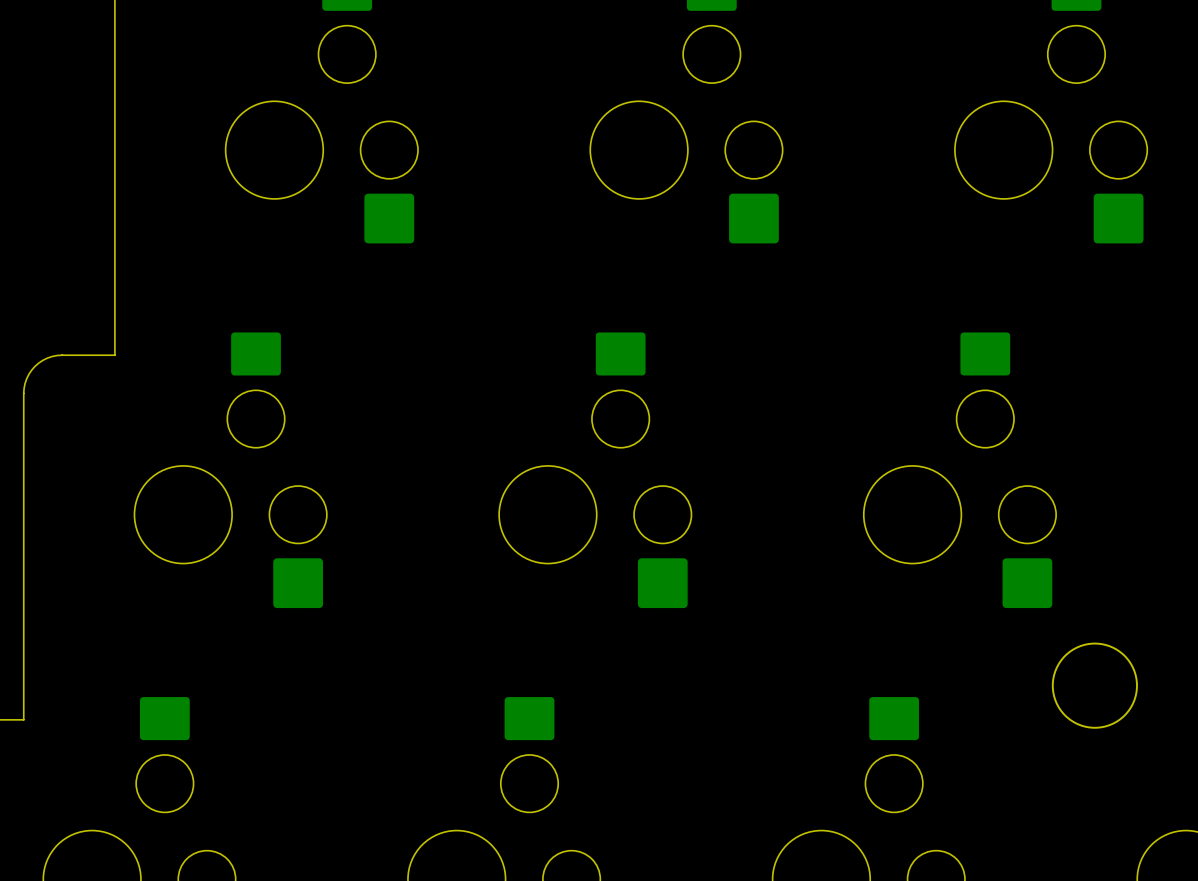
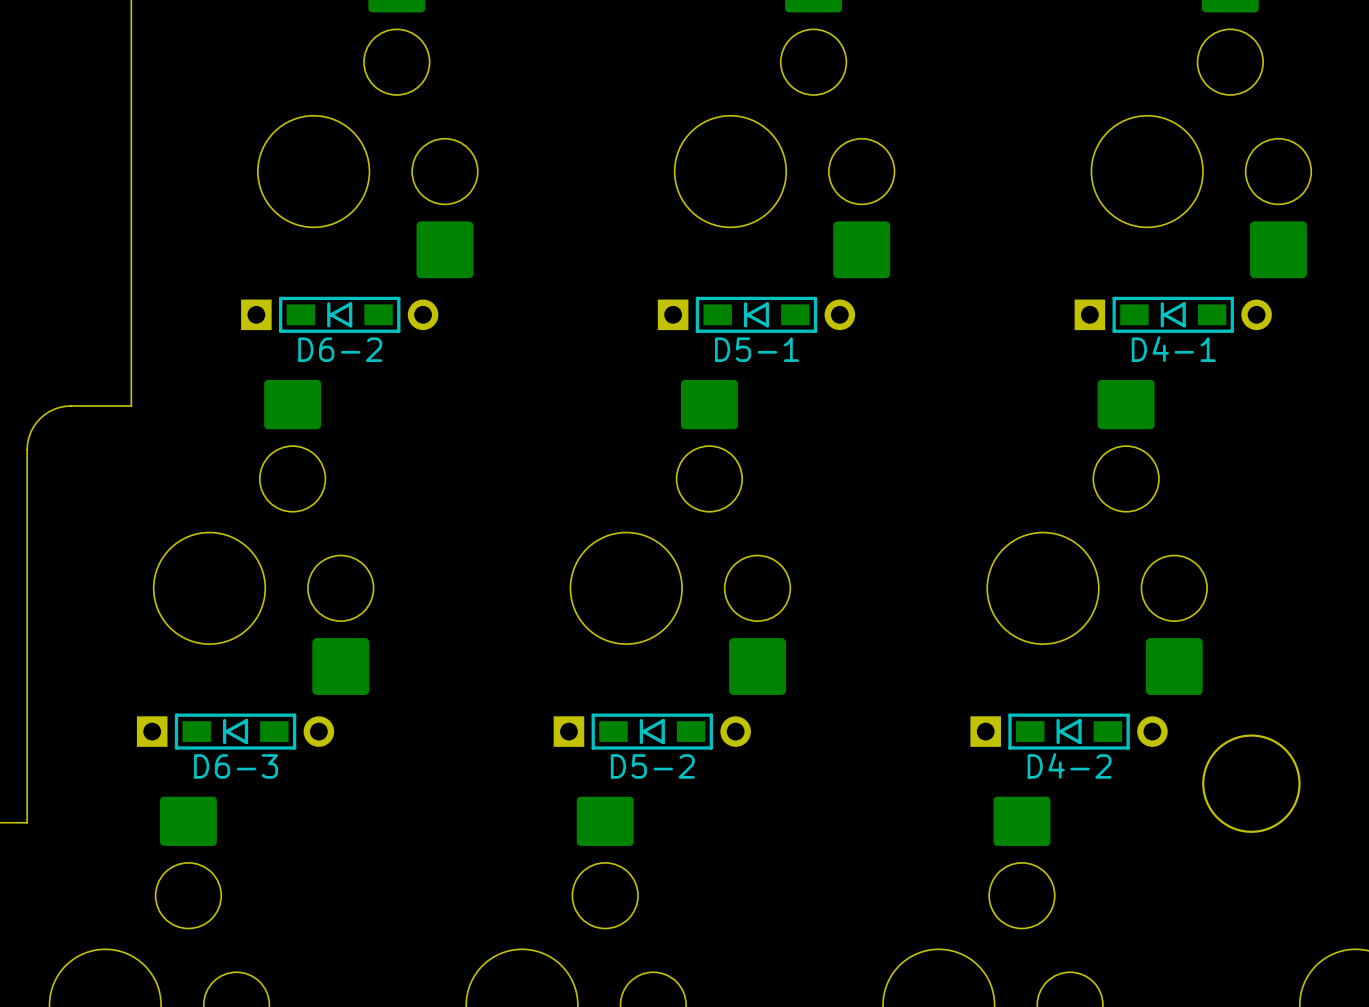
D6-2: none -> (339, 314)
D5-1: none -> (756, 314)
D4-1: none -> (1173, 314)
D6-3: none -> (235, 731)
D5-2: none -> (652, 731)
D4-2: none -> (1069, 731)

